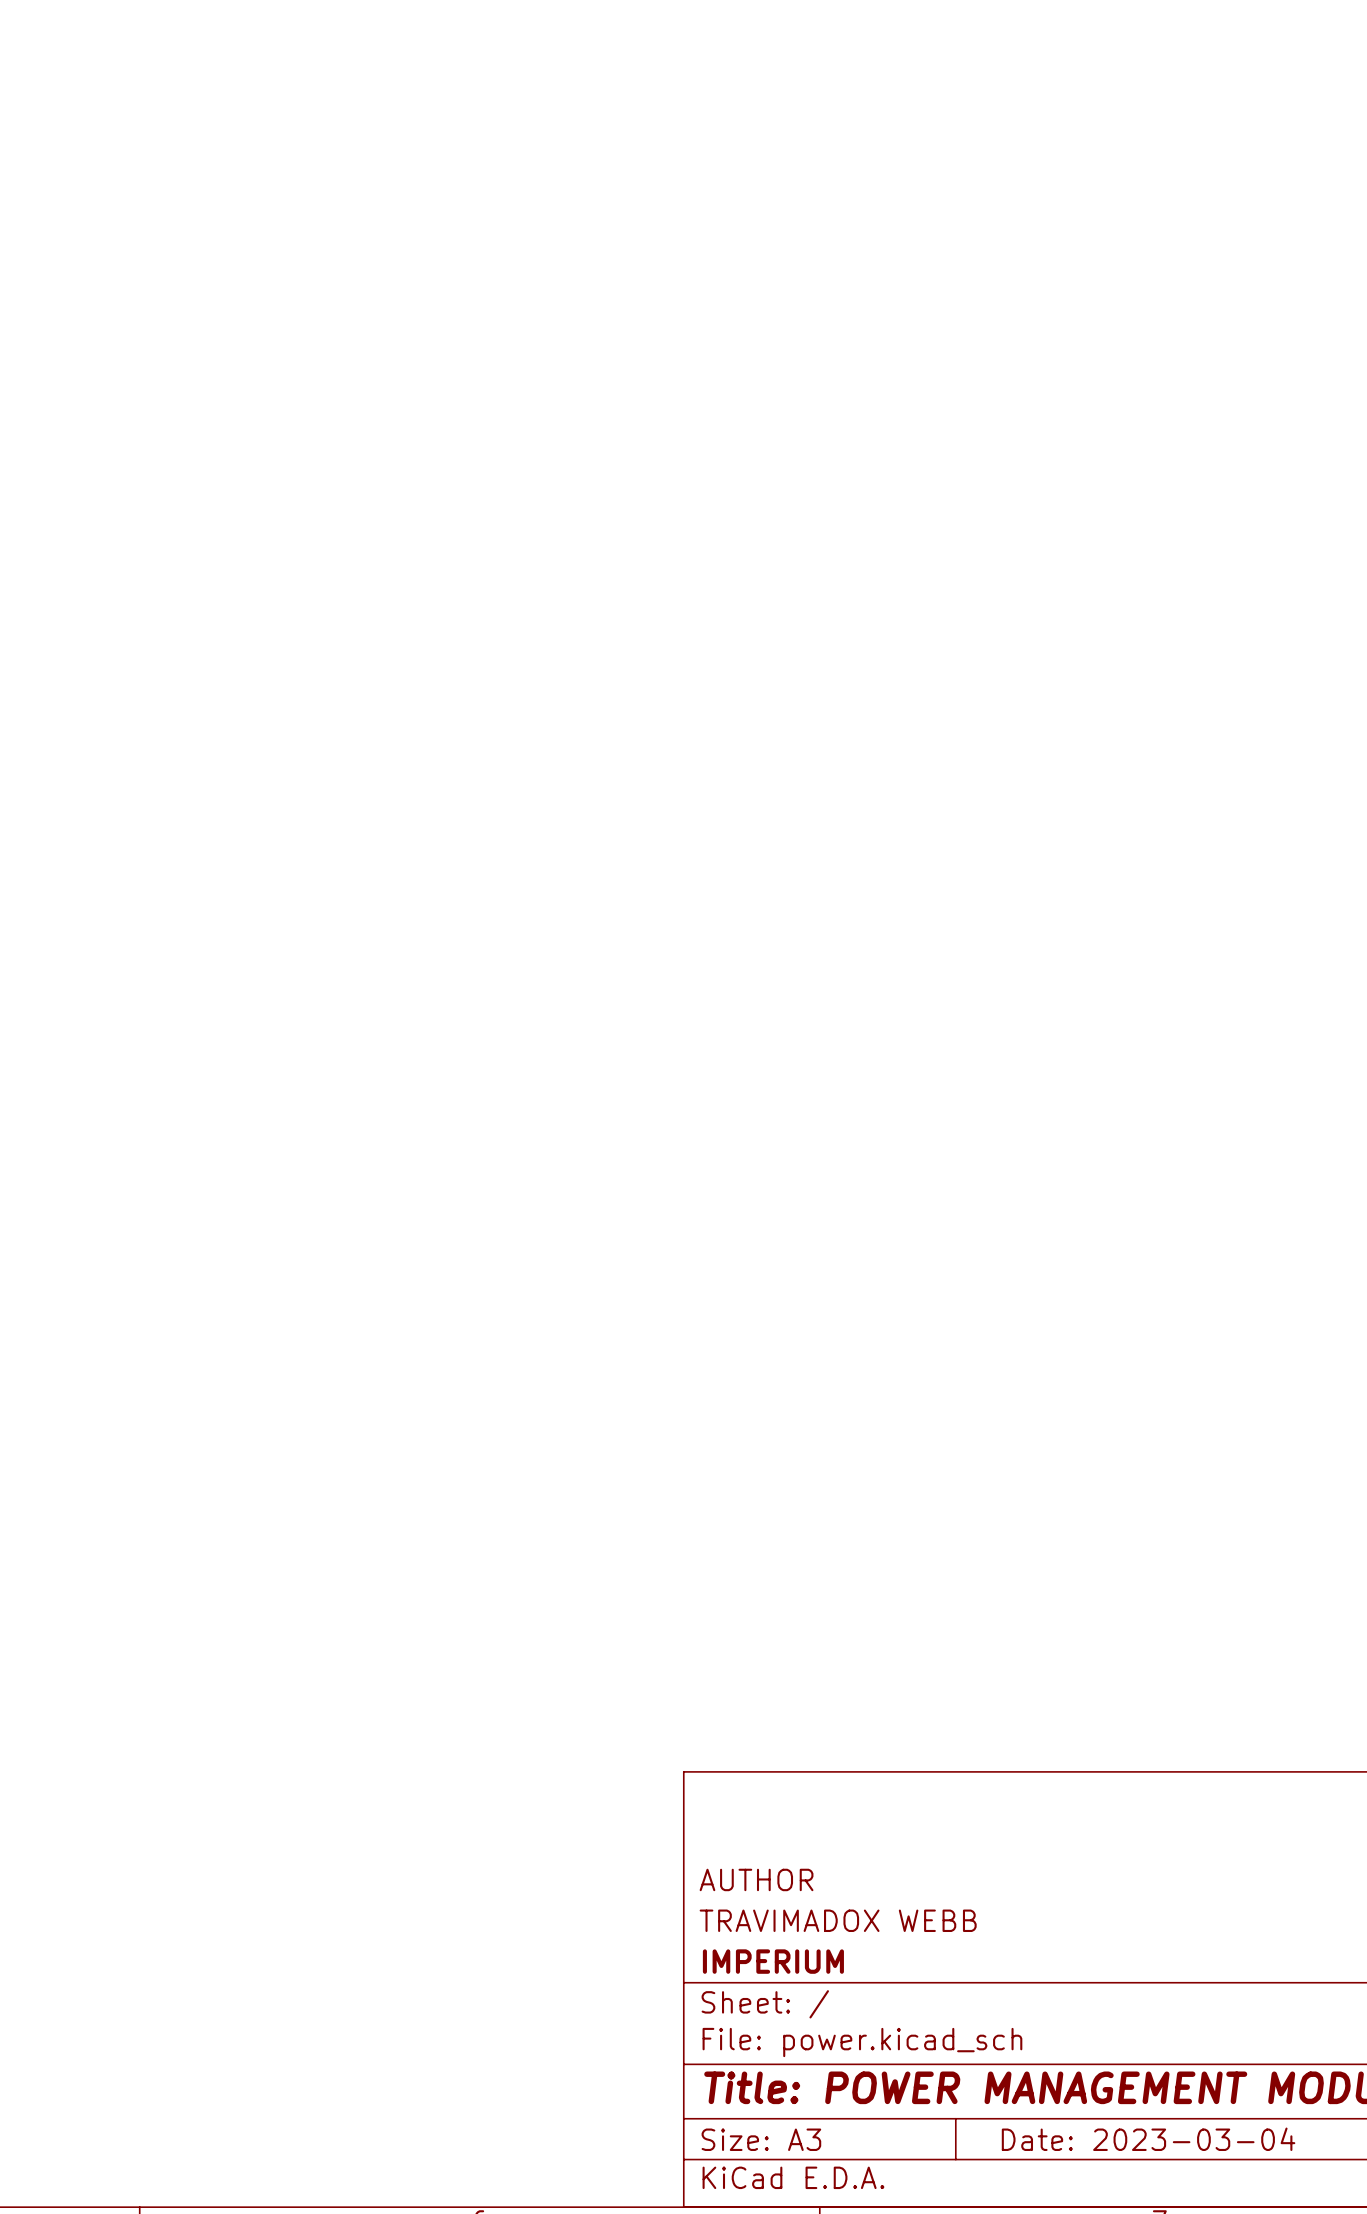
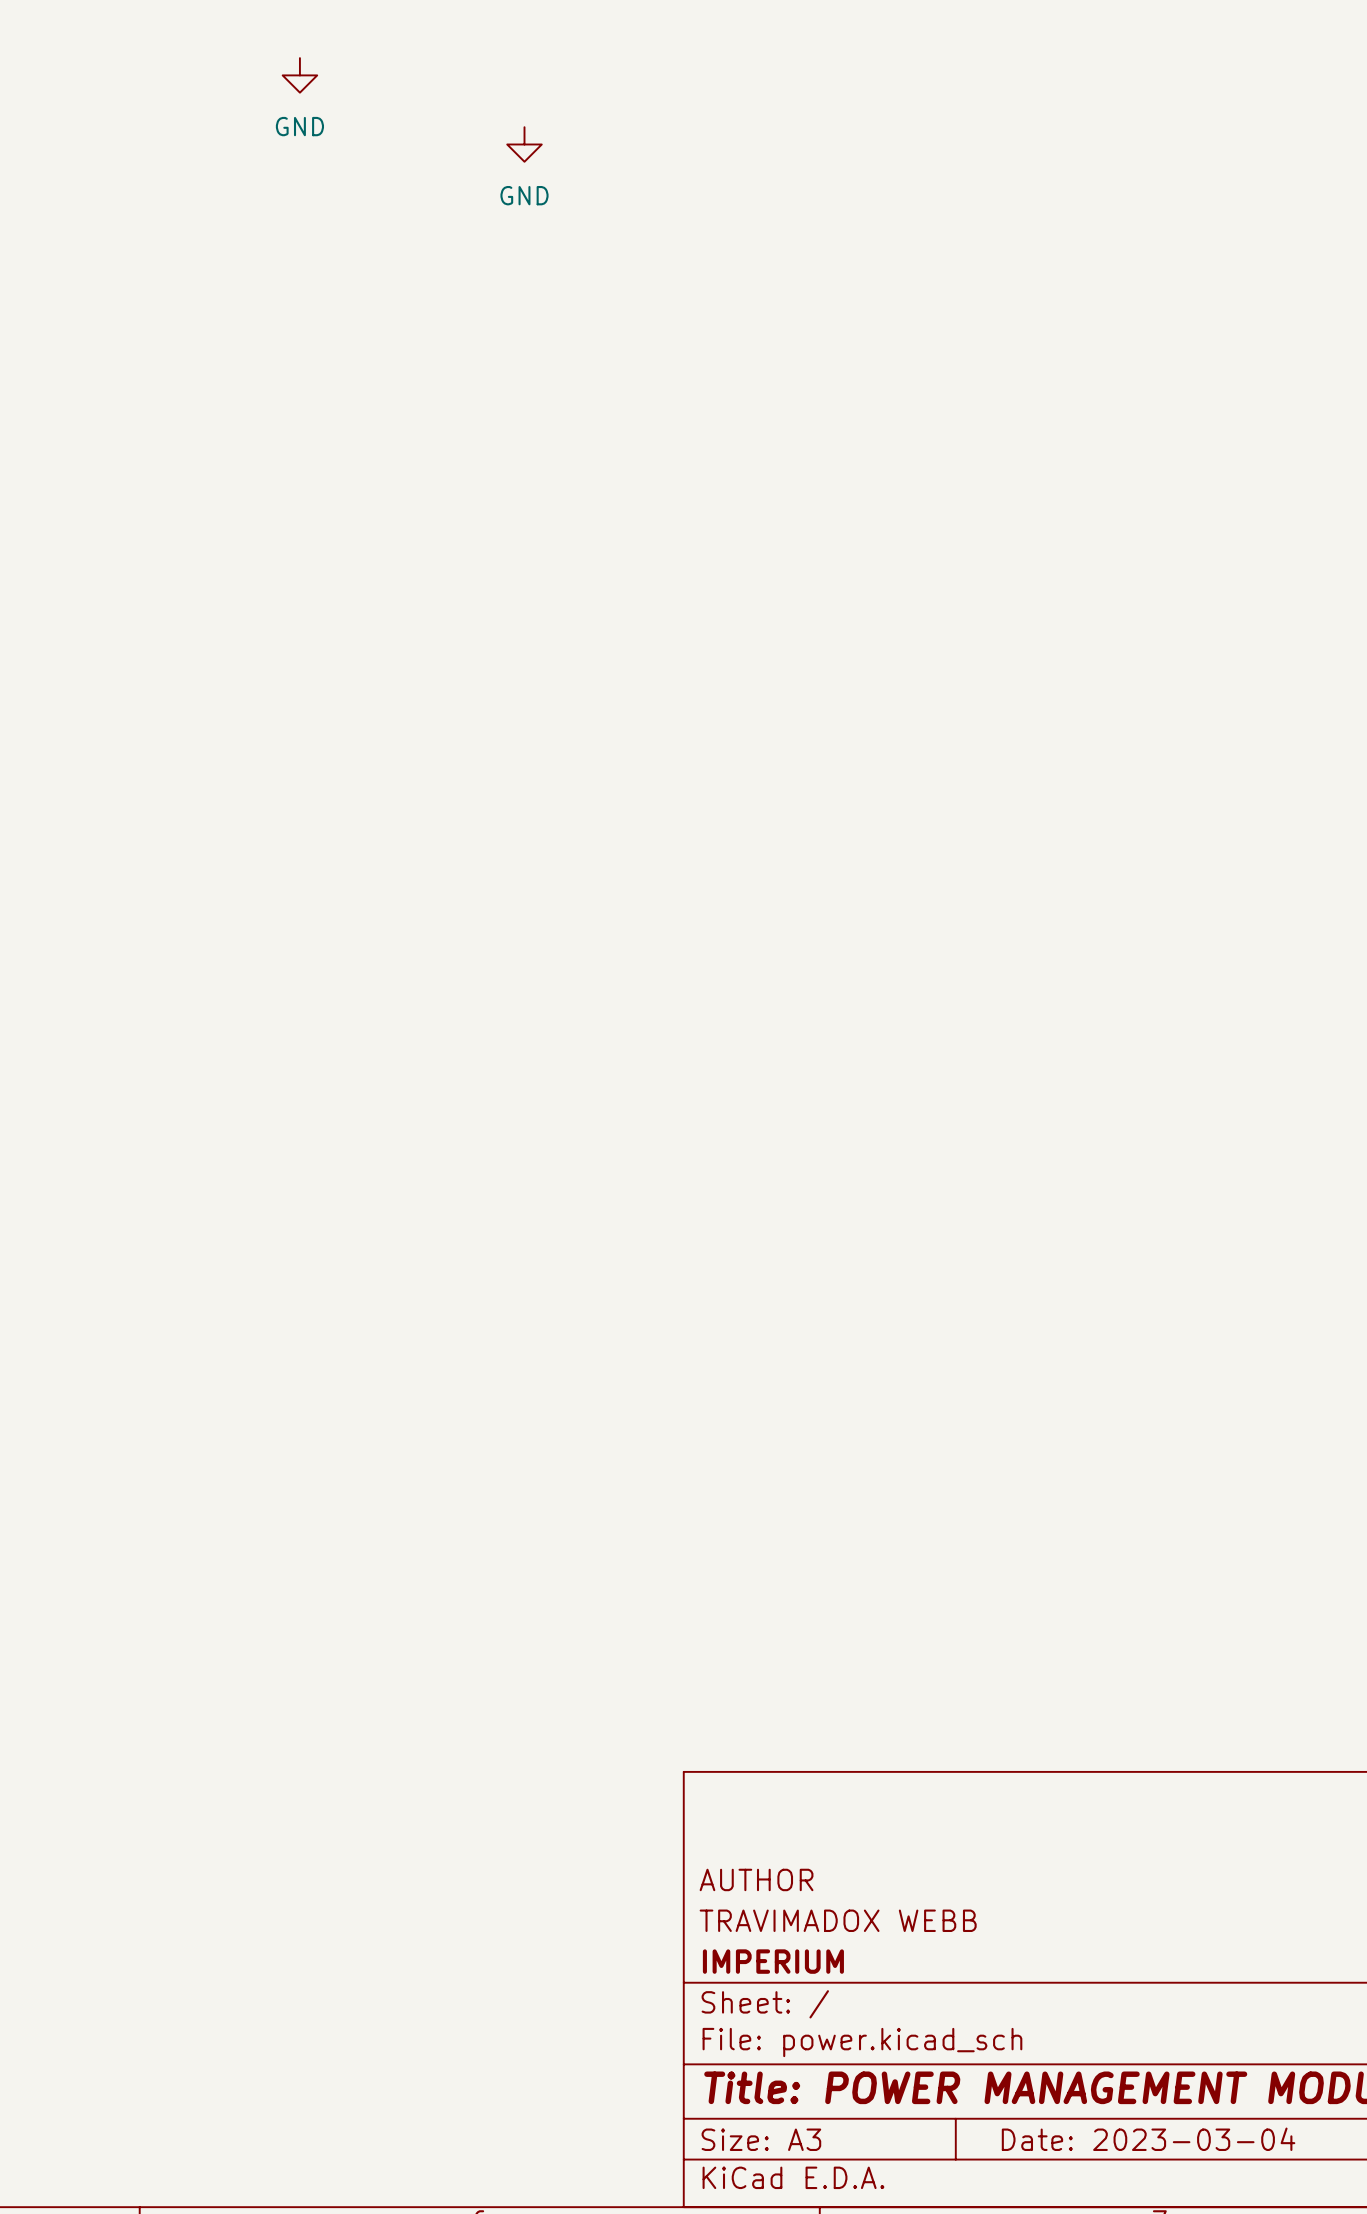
power symbol: none -> GND (299, 75)
power symbol: none -> GND (524, 144)

